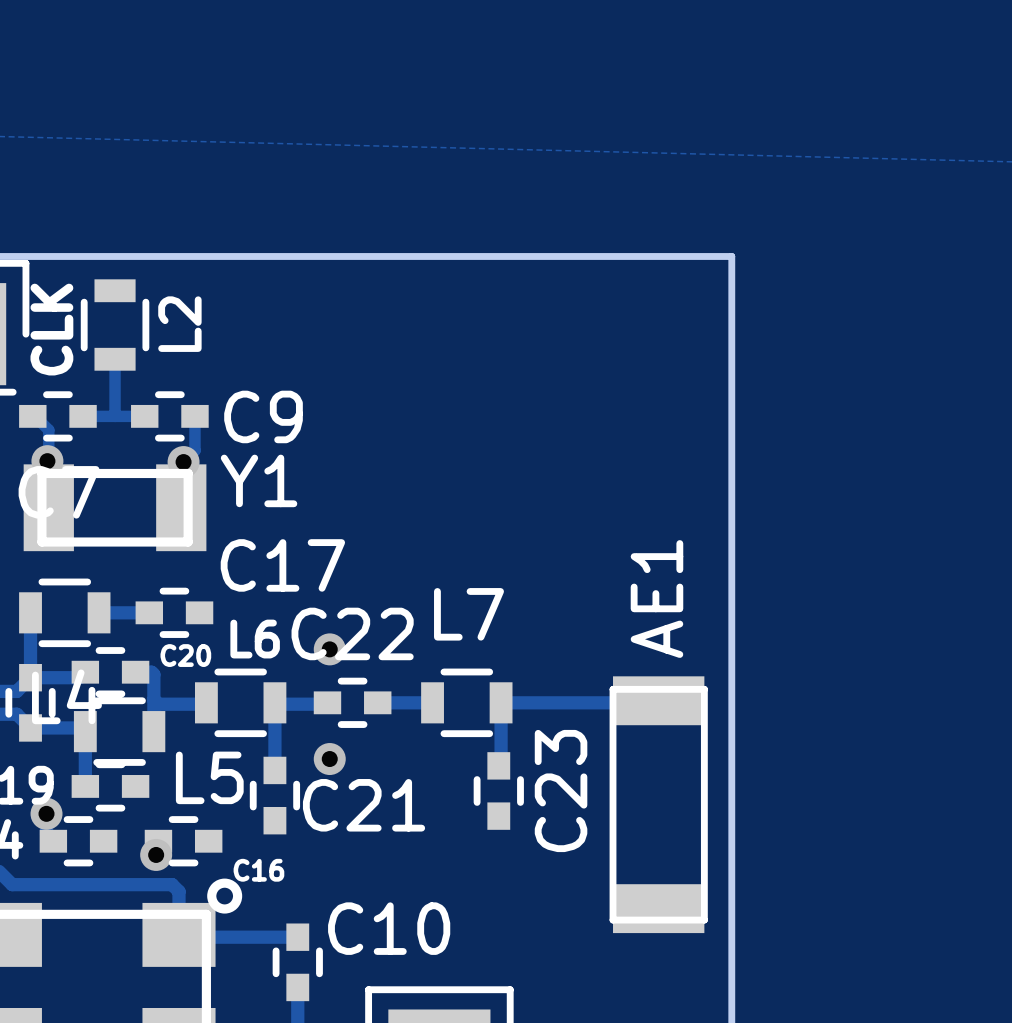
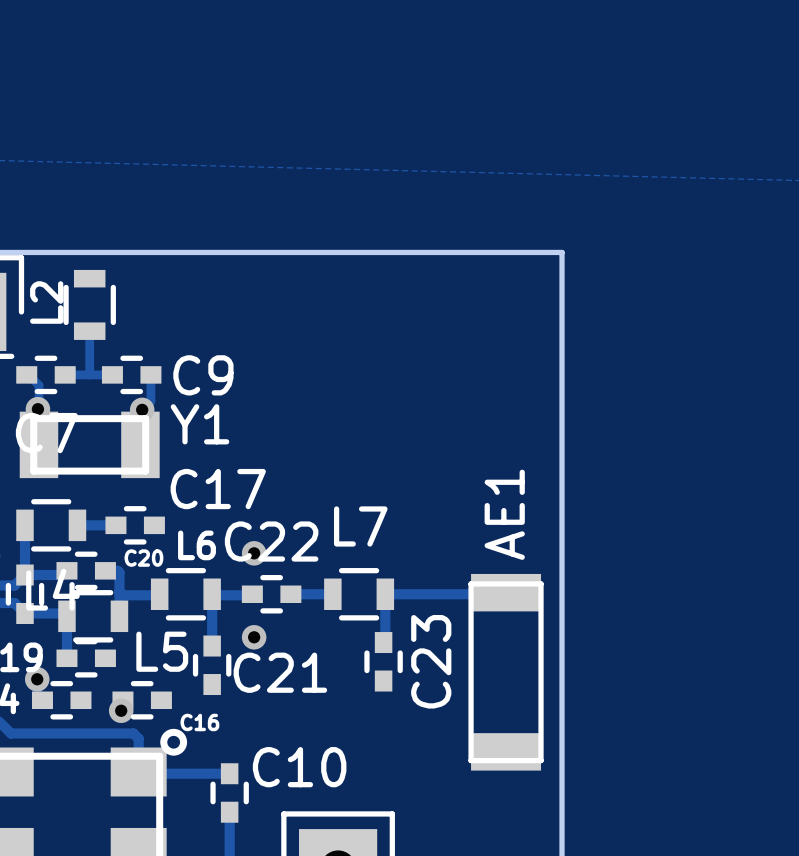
L2 name position: L2 (179, 324) -> L2 (46, 302)
text: CLK (51, 329) -> none

